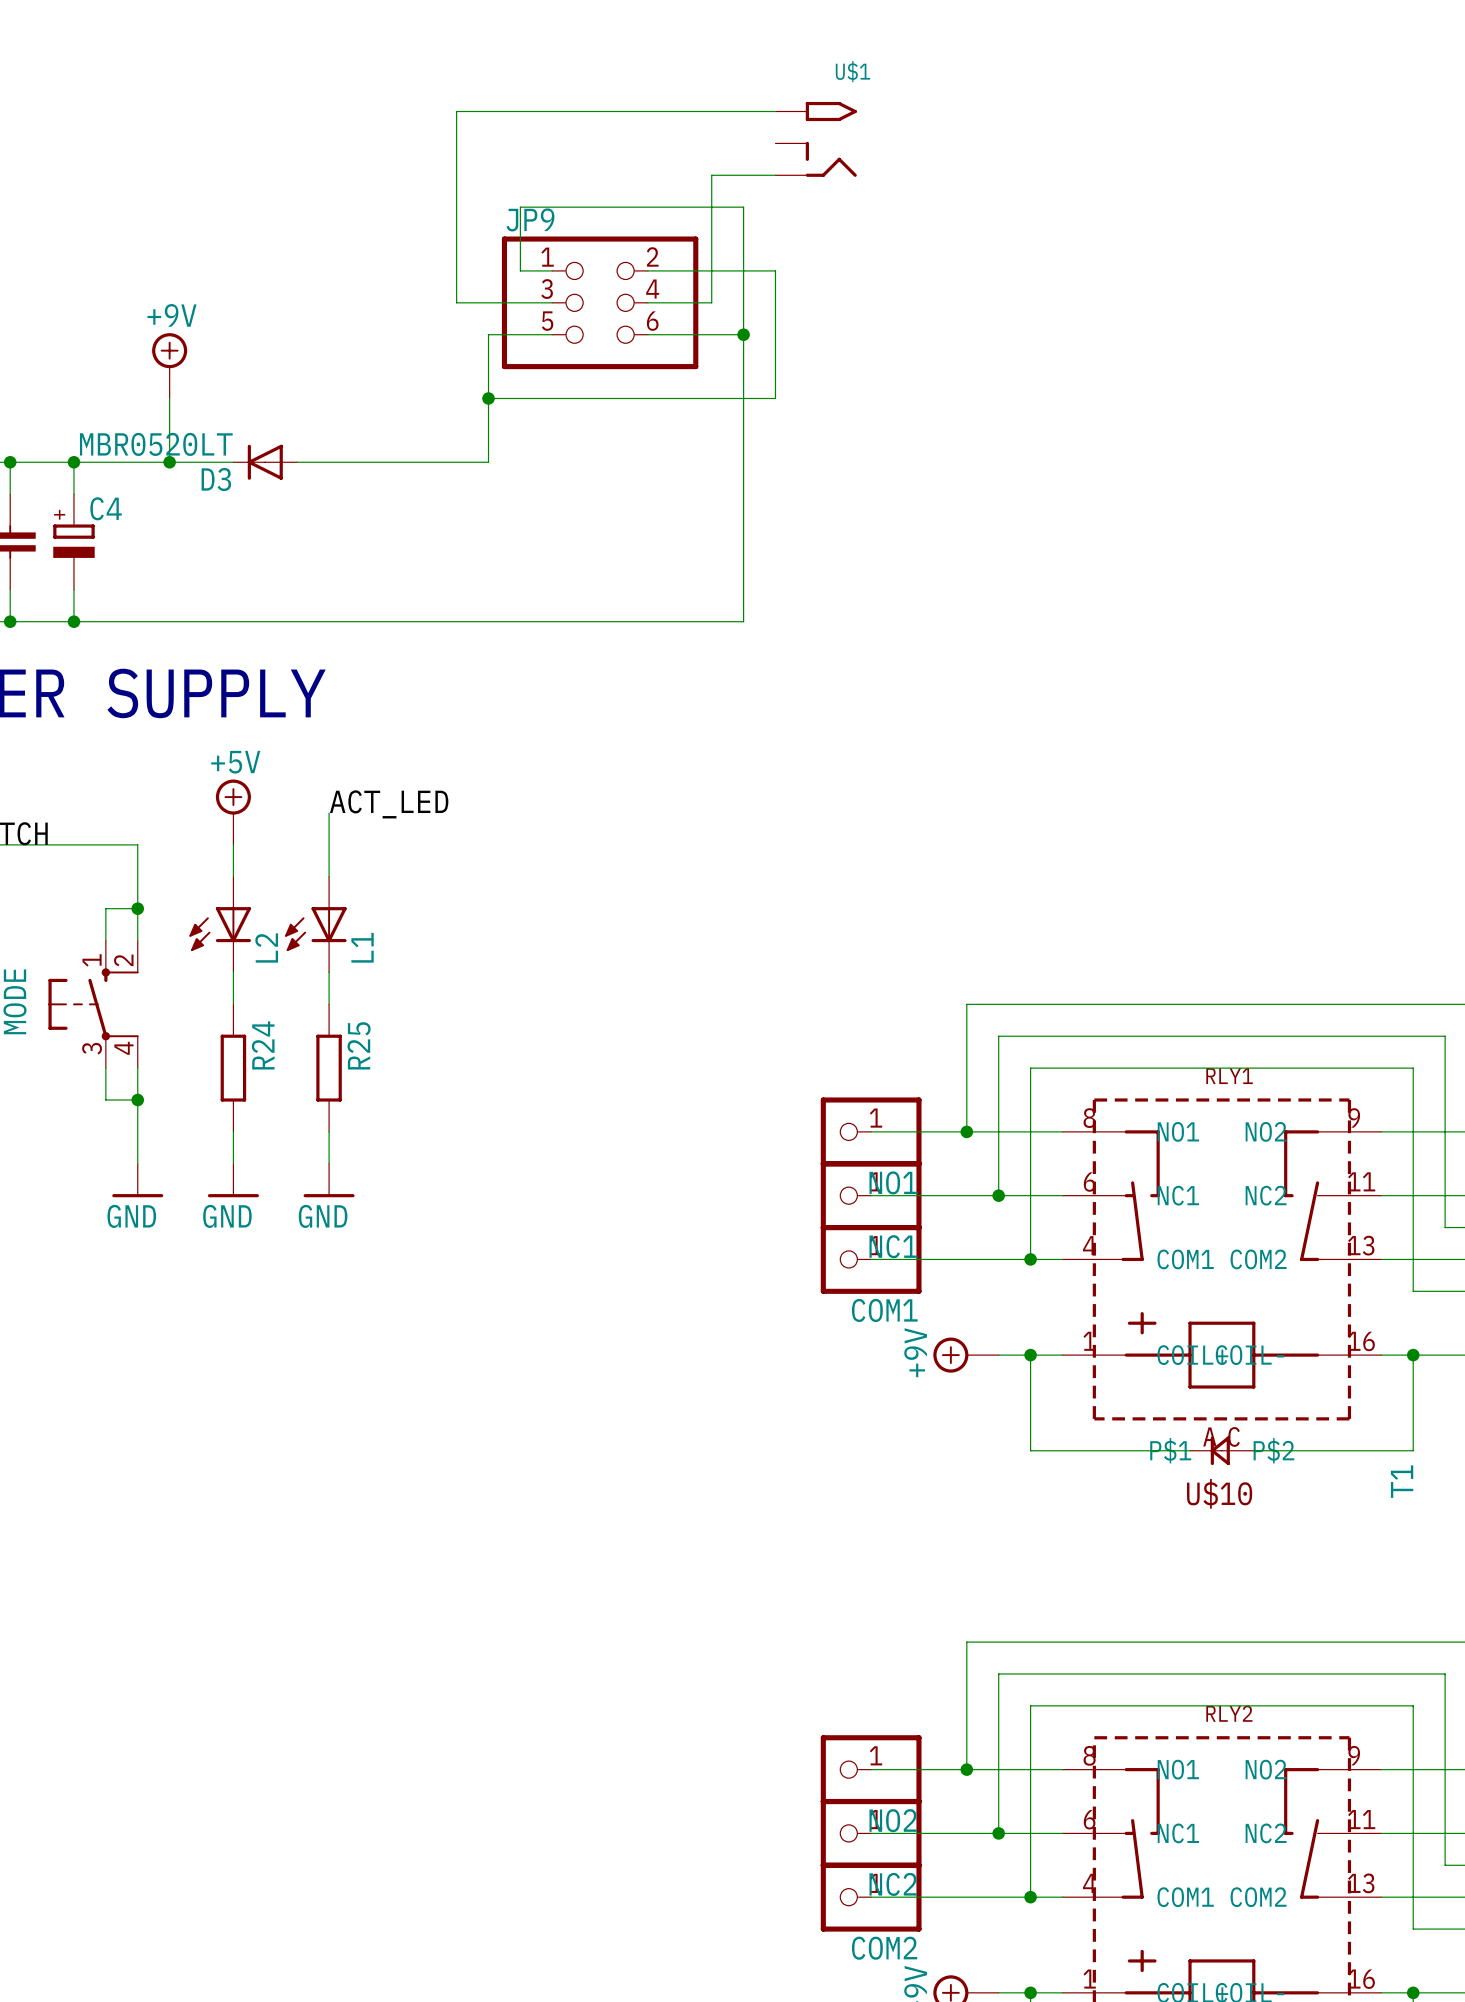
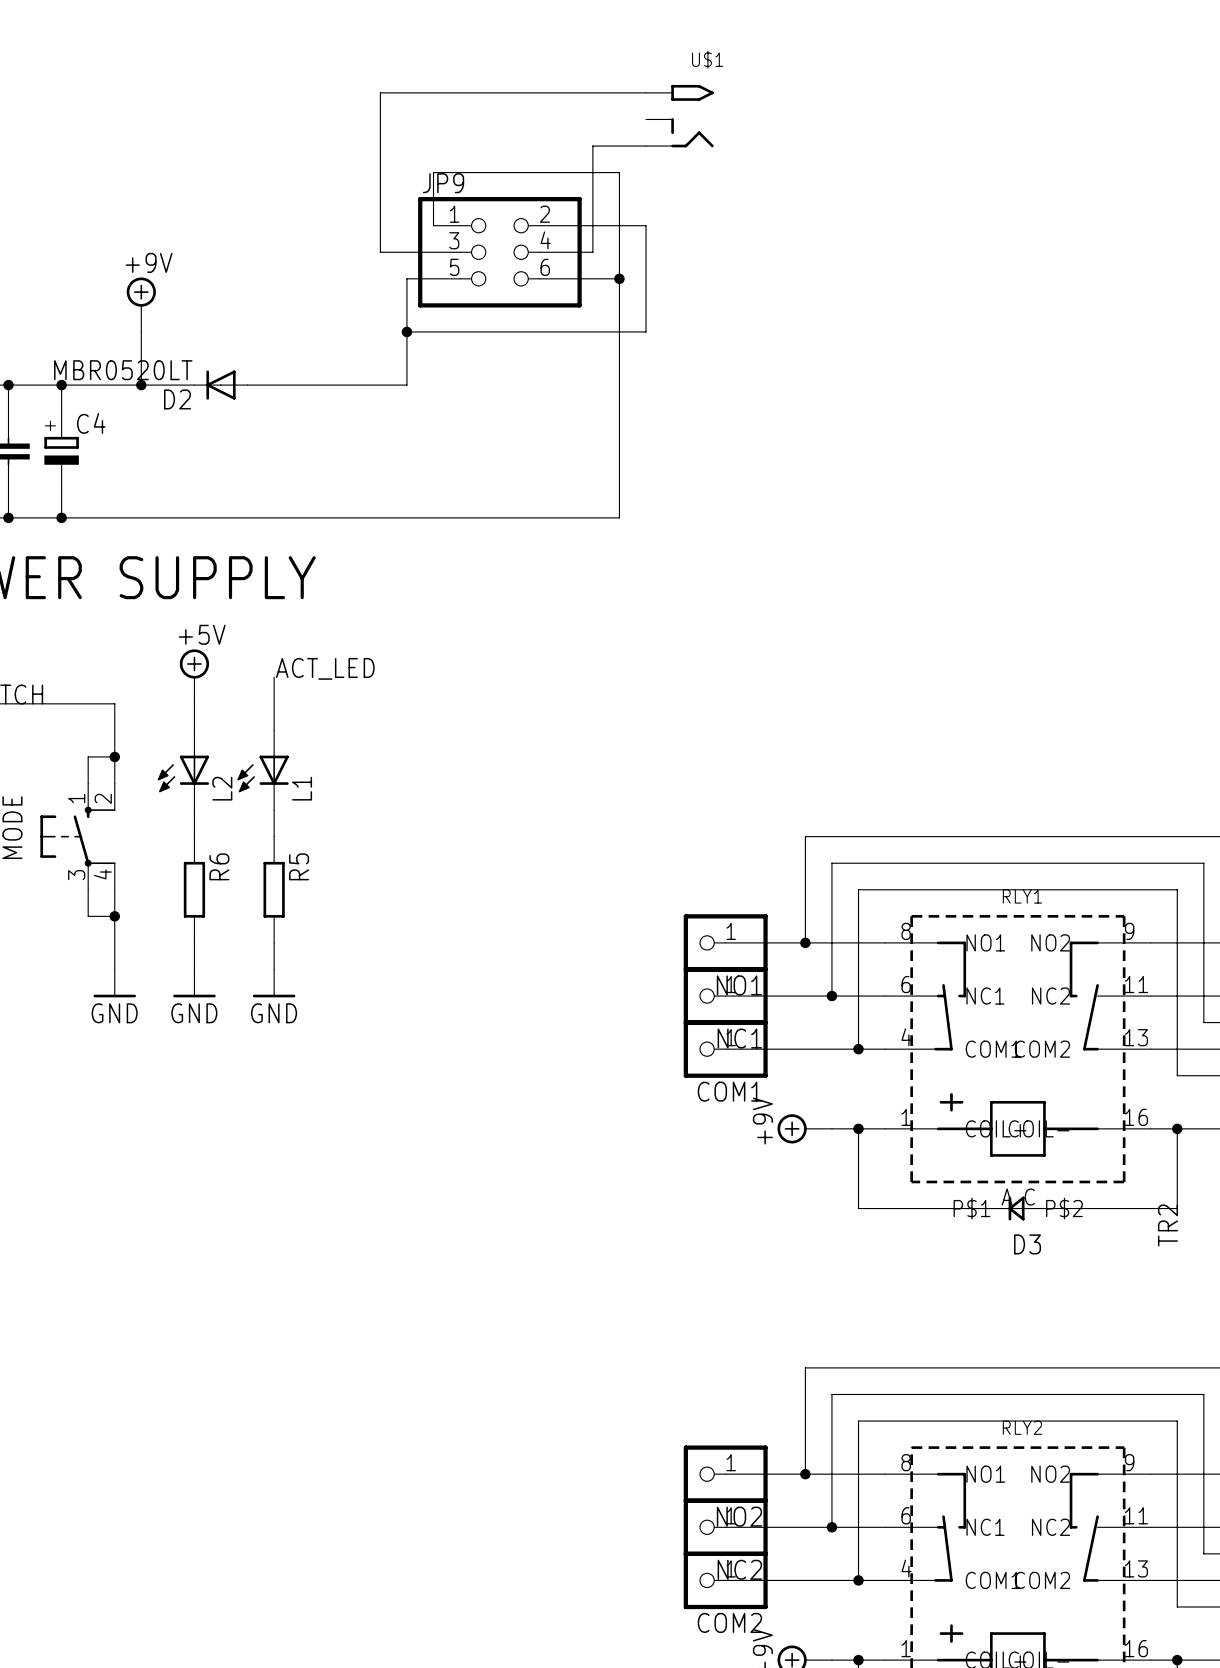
D3 name: D3 (216, 479) -> D2 (177, 399)
R24 name: R24 (263, 1045) -> R6 (219, 866)
R25 name: R25 (359, 1045) -> R5 (299, 866)
T1 name: T1 (1402, 1481) -> TR2 (1167, 1225)
U$10 name: U$10 (1219, 1493) -> D3 (1027, 1244)

